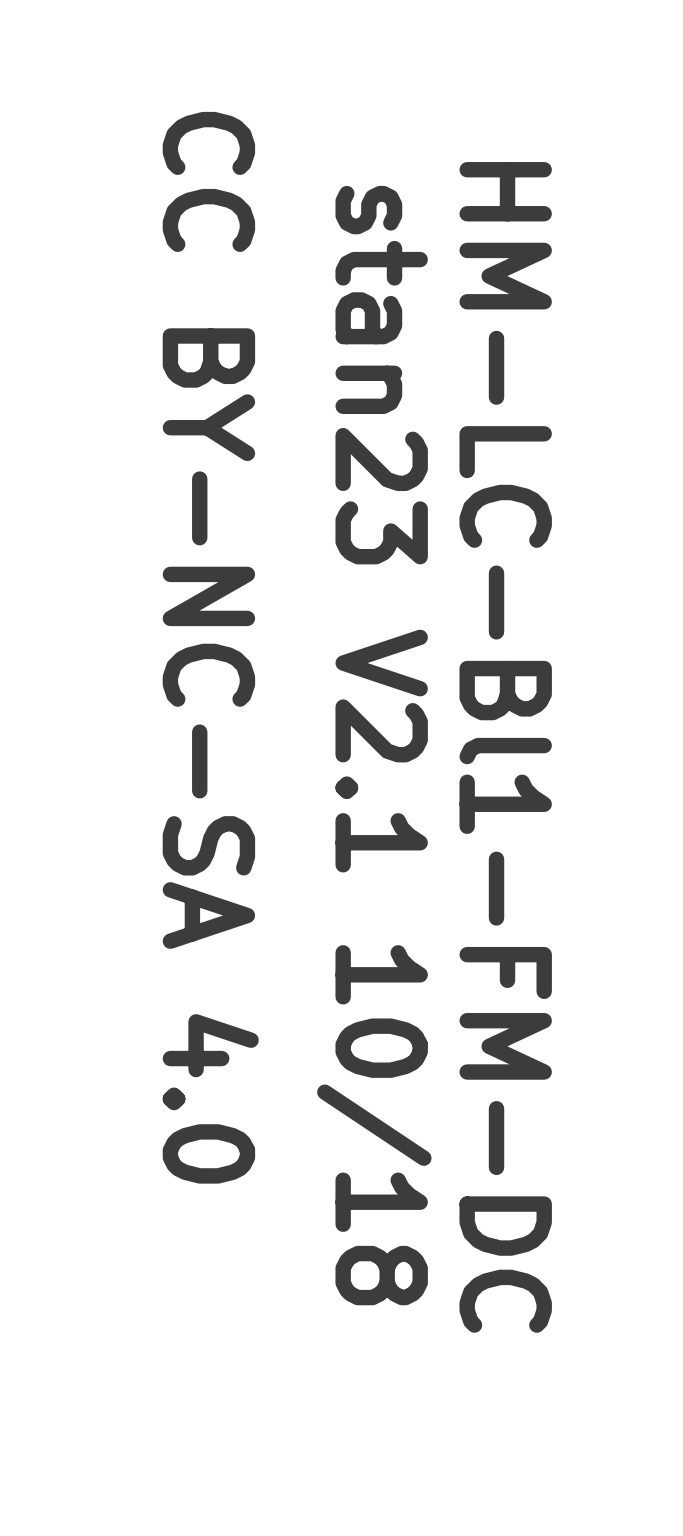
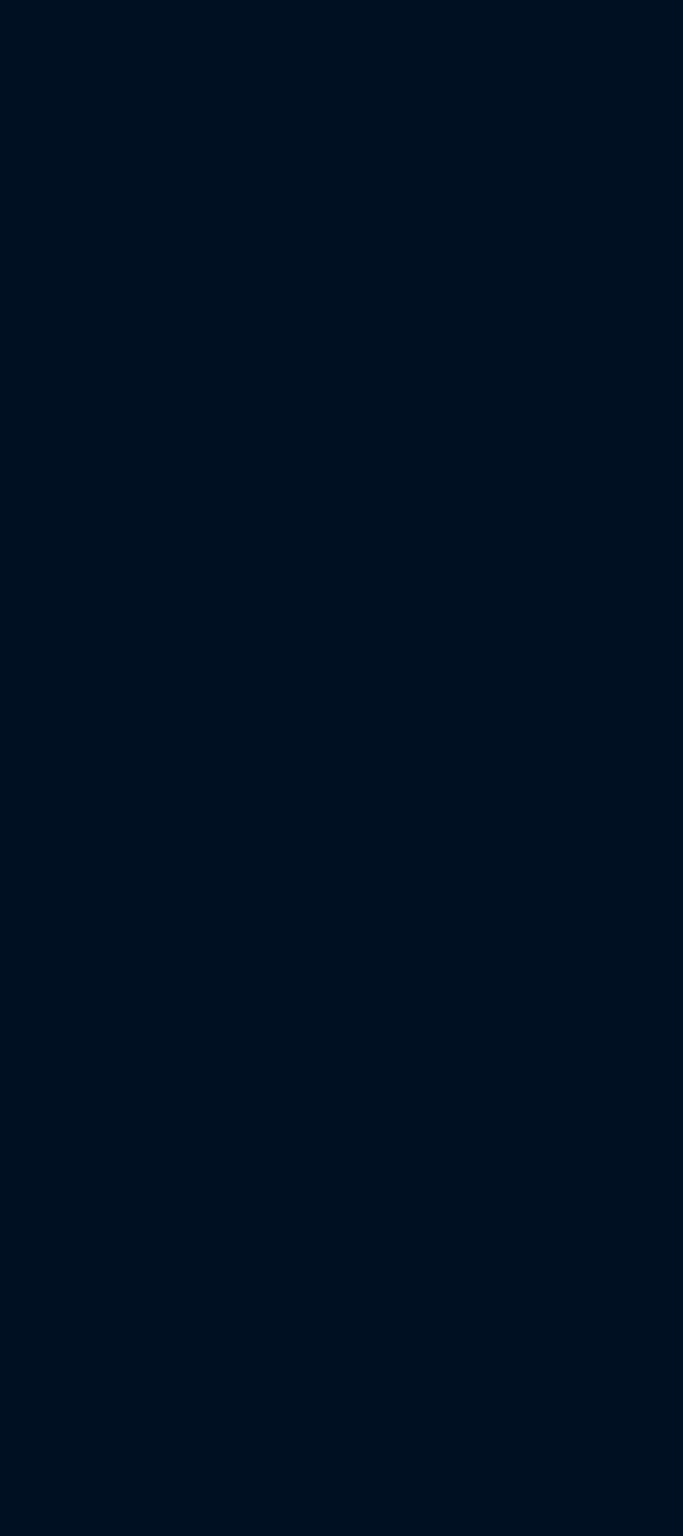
text: CC BY-NC-SA 4.0 (210, 647) -> none
text: stan23 V2.1 10/18 (374, 745) -> none
text: HM-LC-Bl1-FM-DC (505, 747) -> none

